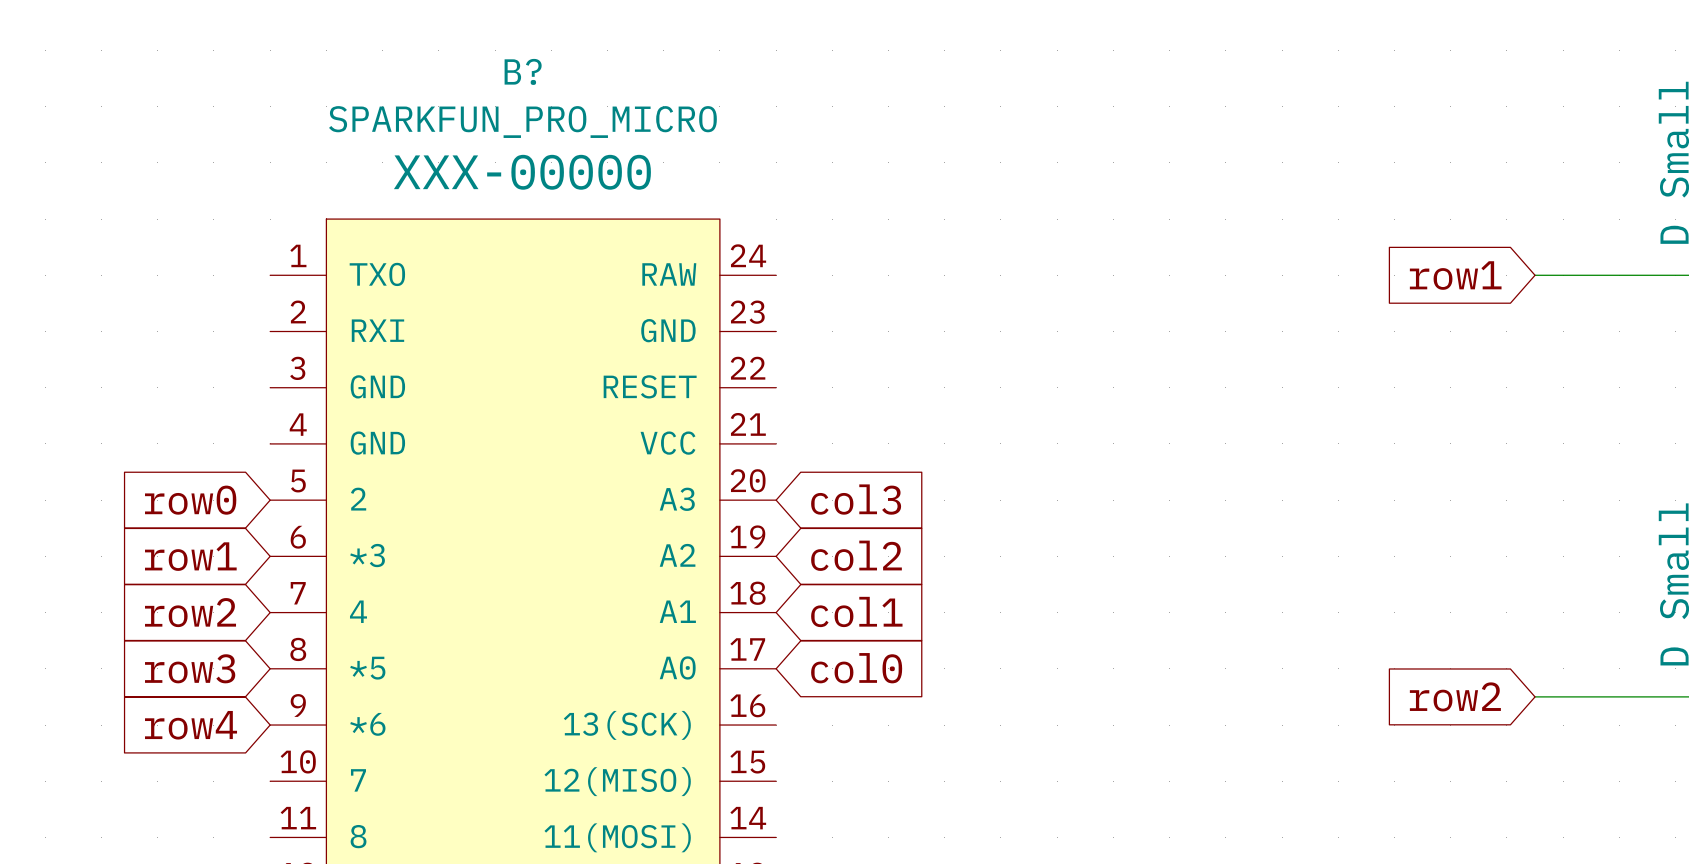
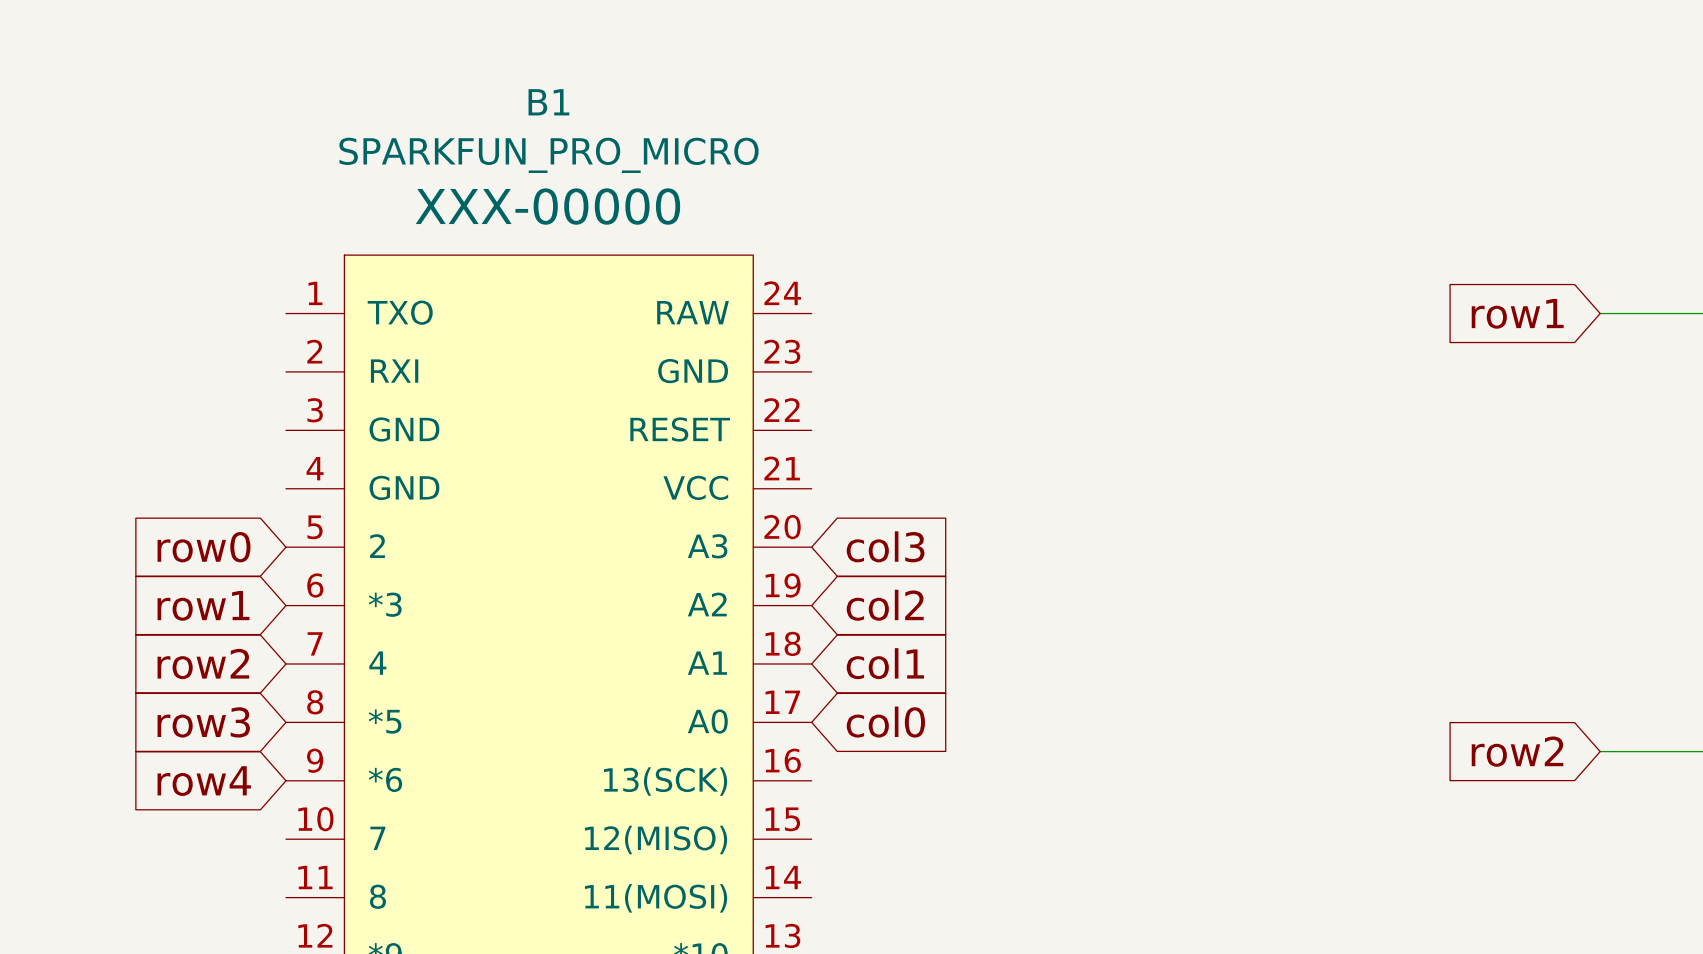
B? name: B? (523, 71) -> B1 (548, 102)

